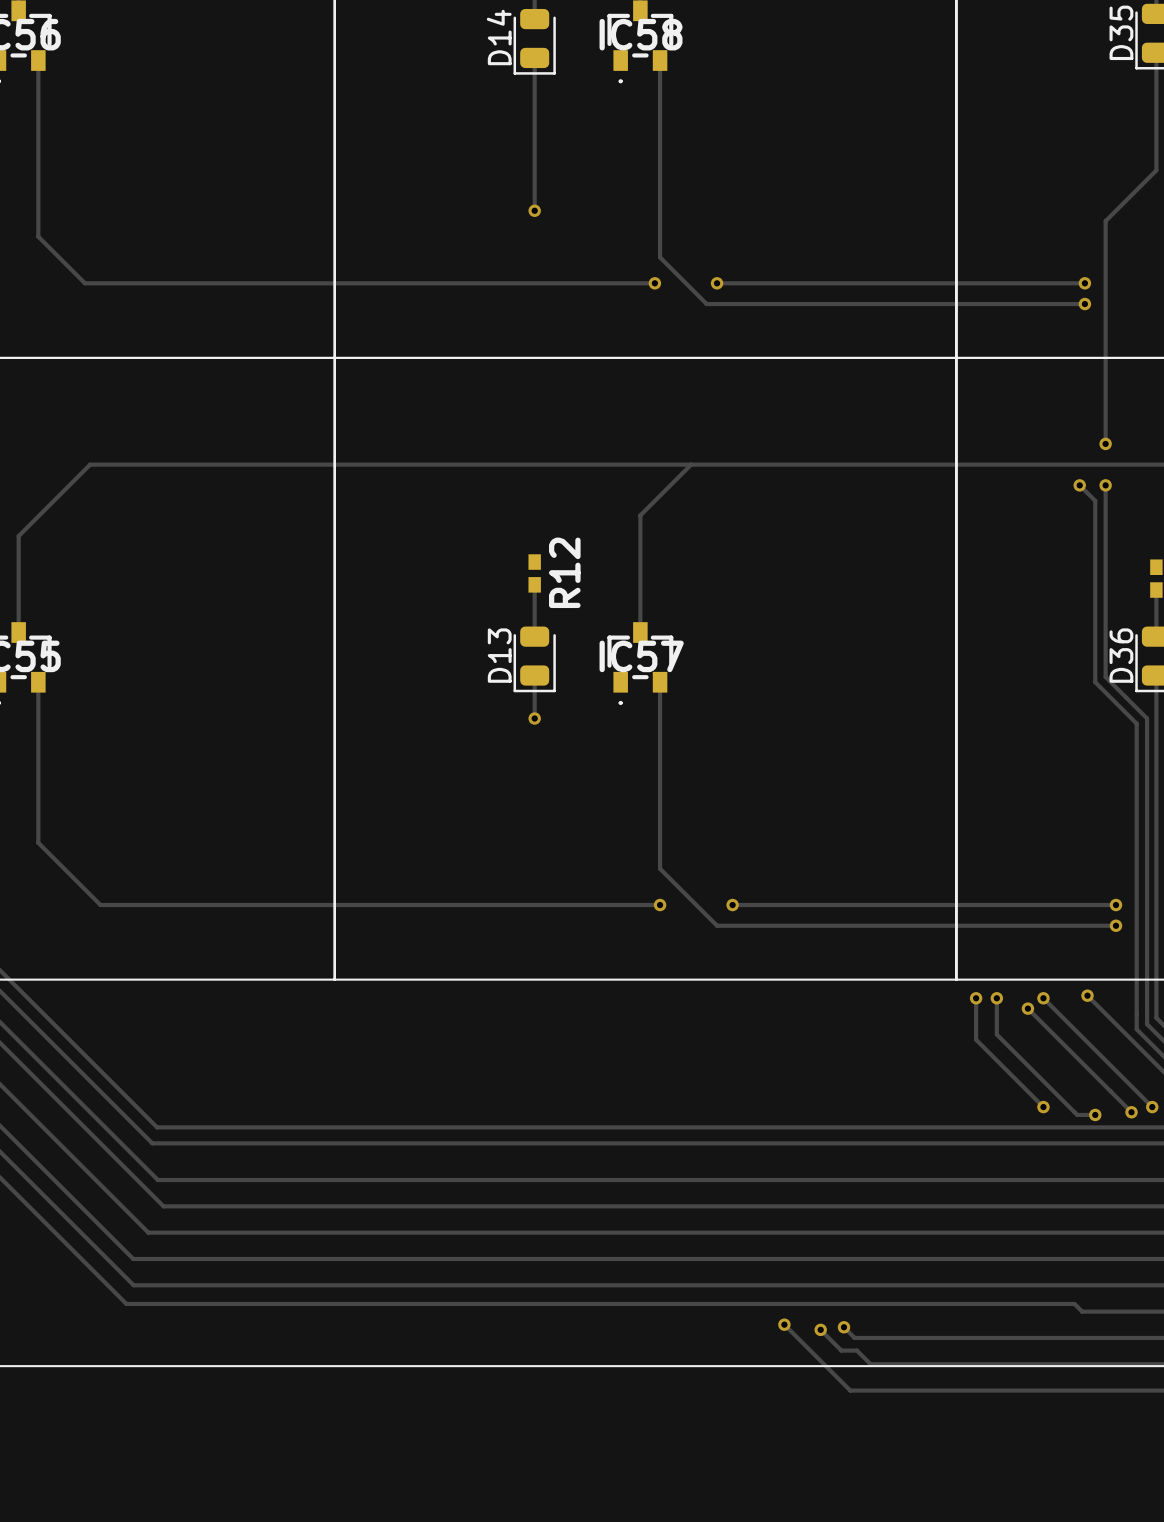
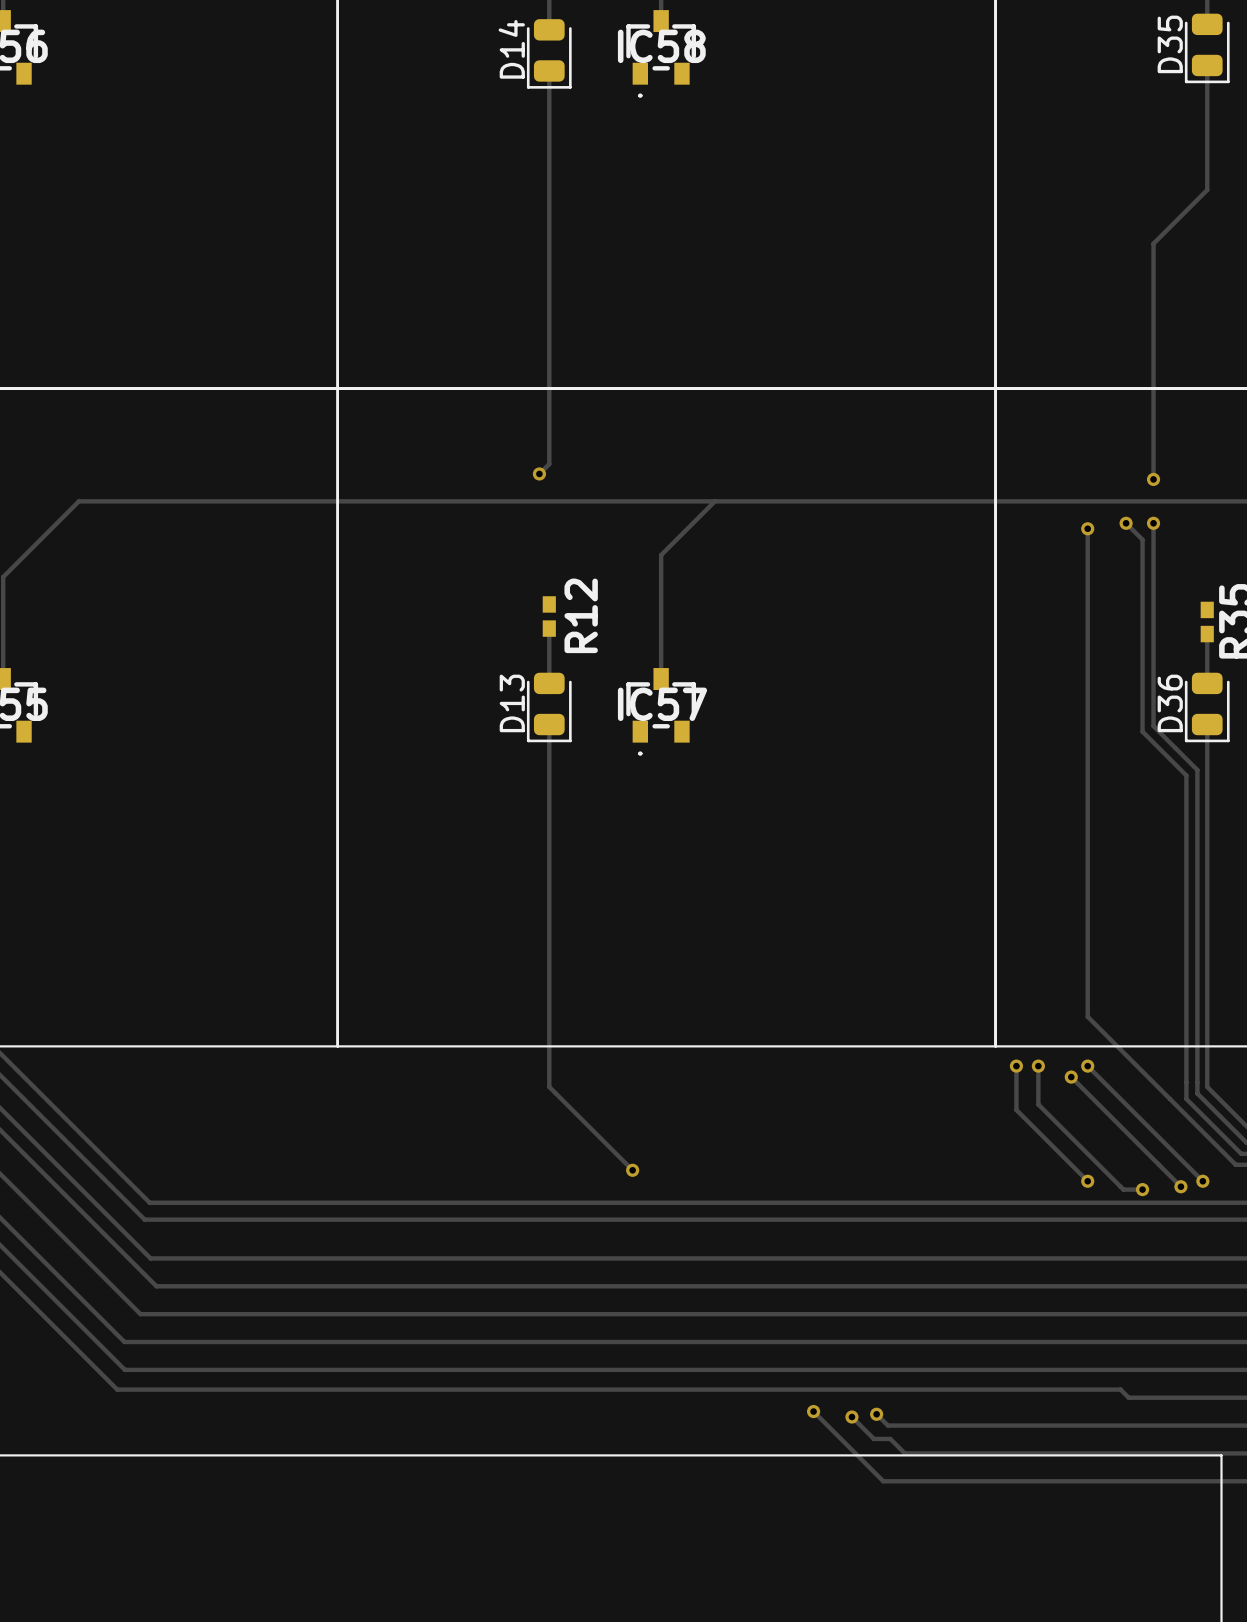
track: (38, 60) (38, 236) (84, 283) (654, 283) -> none
track: (660, 60) (660, 257) (706, 304) (1084, 304) -> none
track: none -> (549, 232) (549, 464) (539, 473)
via: (534, 210) -> none
via: (654, 283) -> none
track: (717, 283) (1084, 283) -> none
via: (717, 283) -> none
via: (1084, 283) -> none
via: (1084, 304) -> none
via: none -> (539, 473)
track: none -> (1087, 528) (1087, 1016) (1134, 1063)
via: none -> (1087, 528)
track: (38, 682) (38, 842) (100, 905) (660, 905) -> none
track: (660, 682) (660, 868) (717, 925) (1115, 925) -> none
track: none -> (549, 770) (549, 1086) (632, 1170)
via: (534, 718) -> none
via: (660, 905) -> none
track: (732, 905) (1115, 905) -> none
via: (732, 905) -> none
via: (1115, 905) -> none
via: (1115, 925) -> none
via: (1087, 995) -> none
via: none -> (632, 1170)

